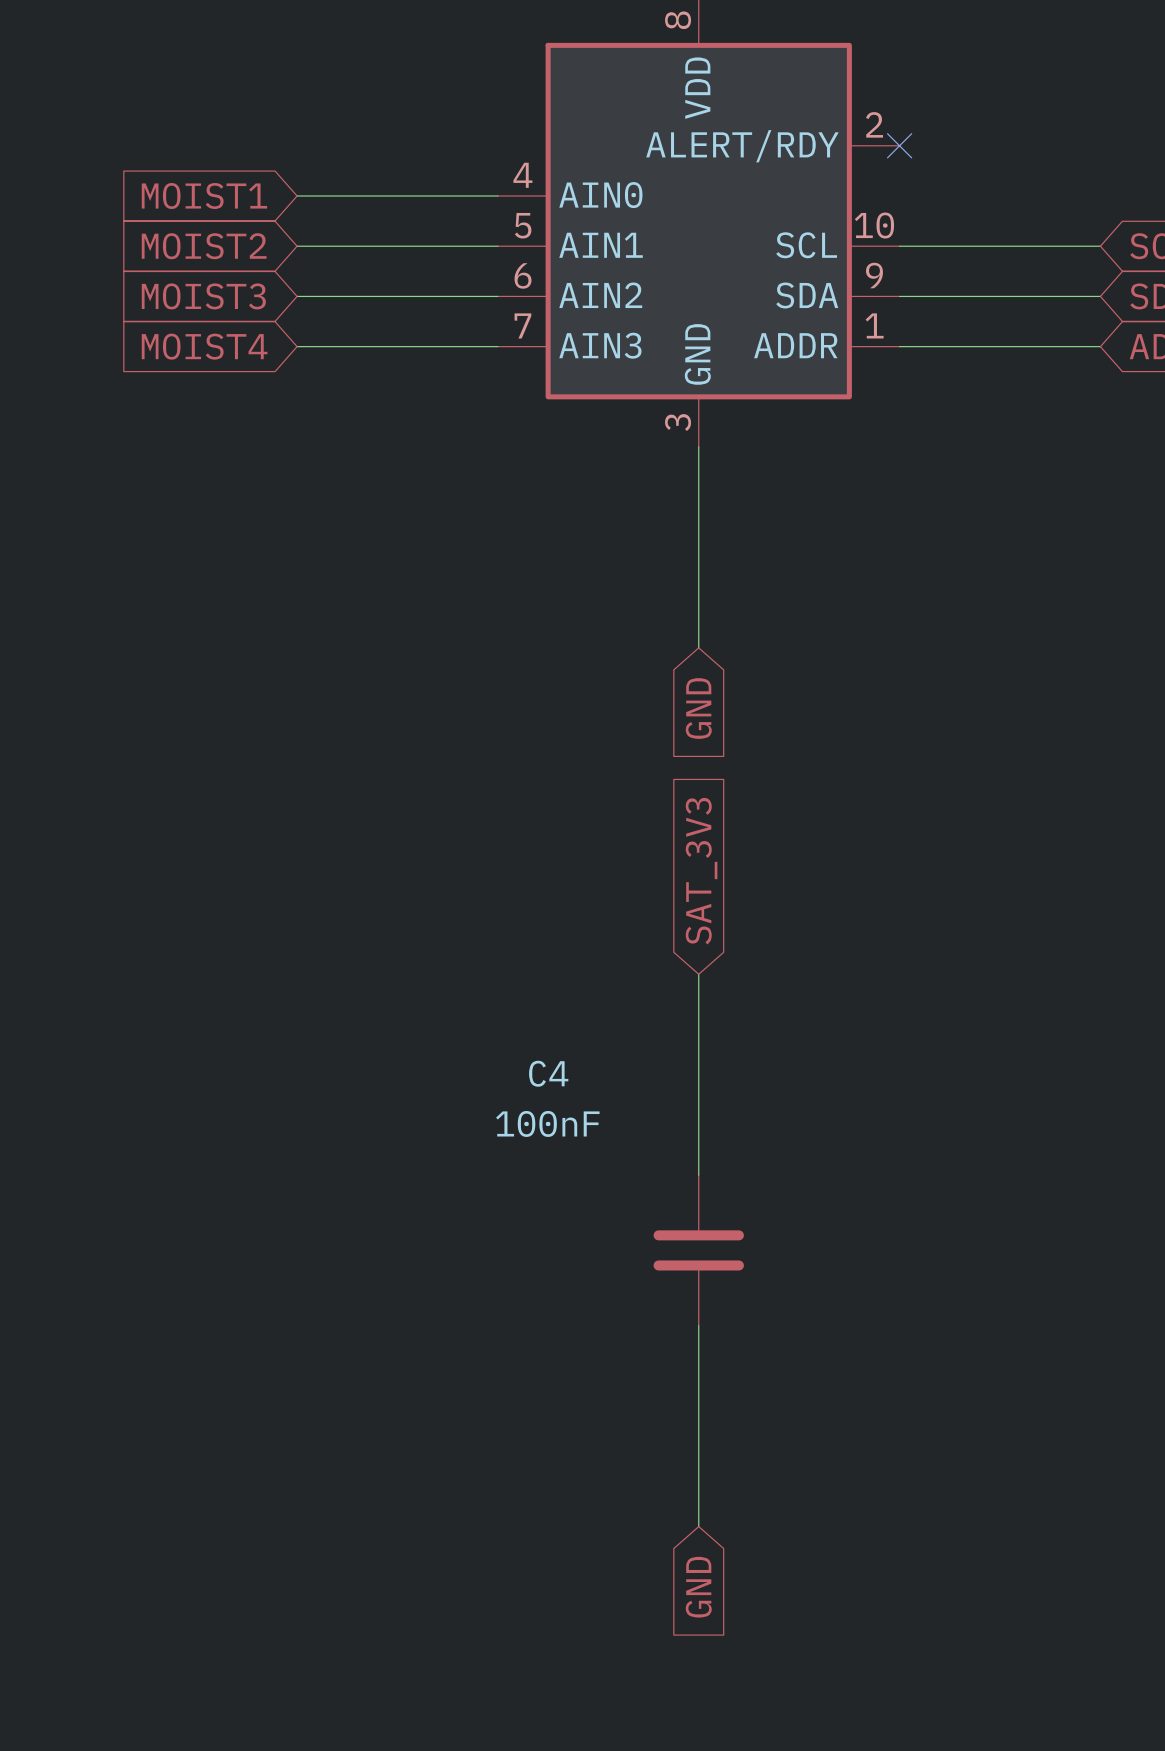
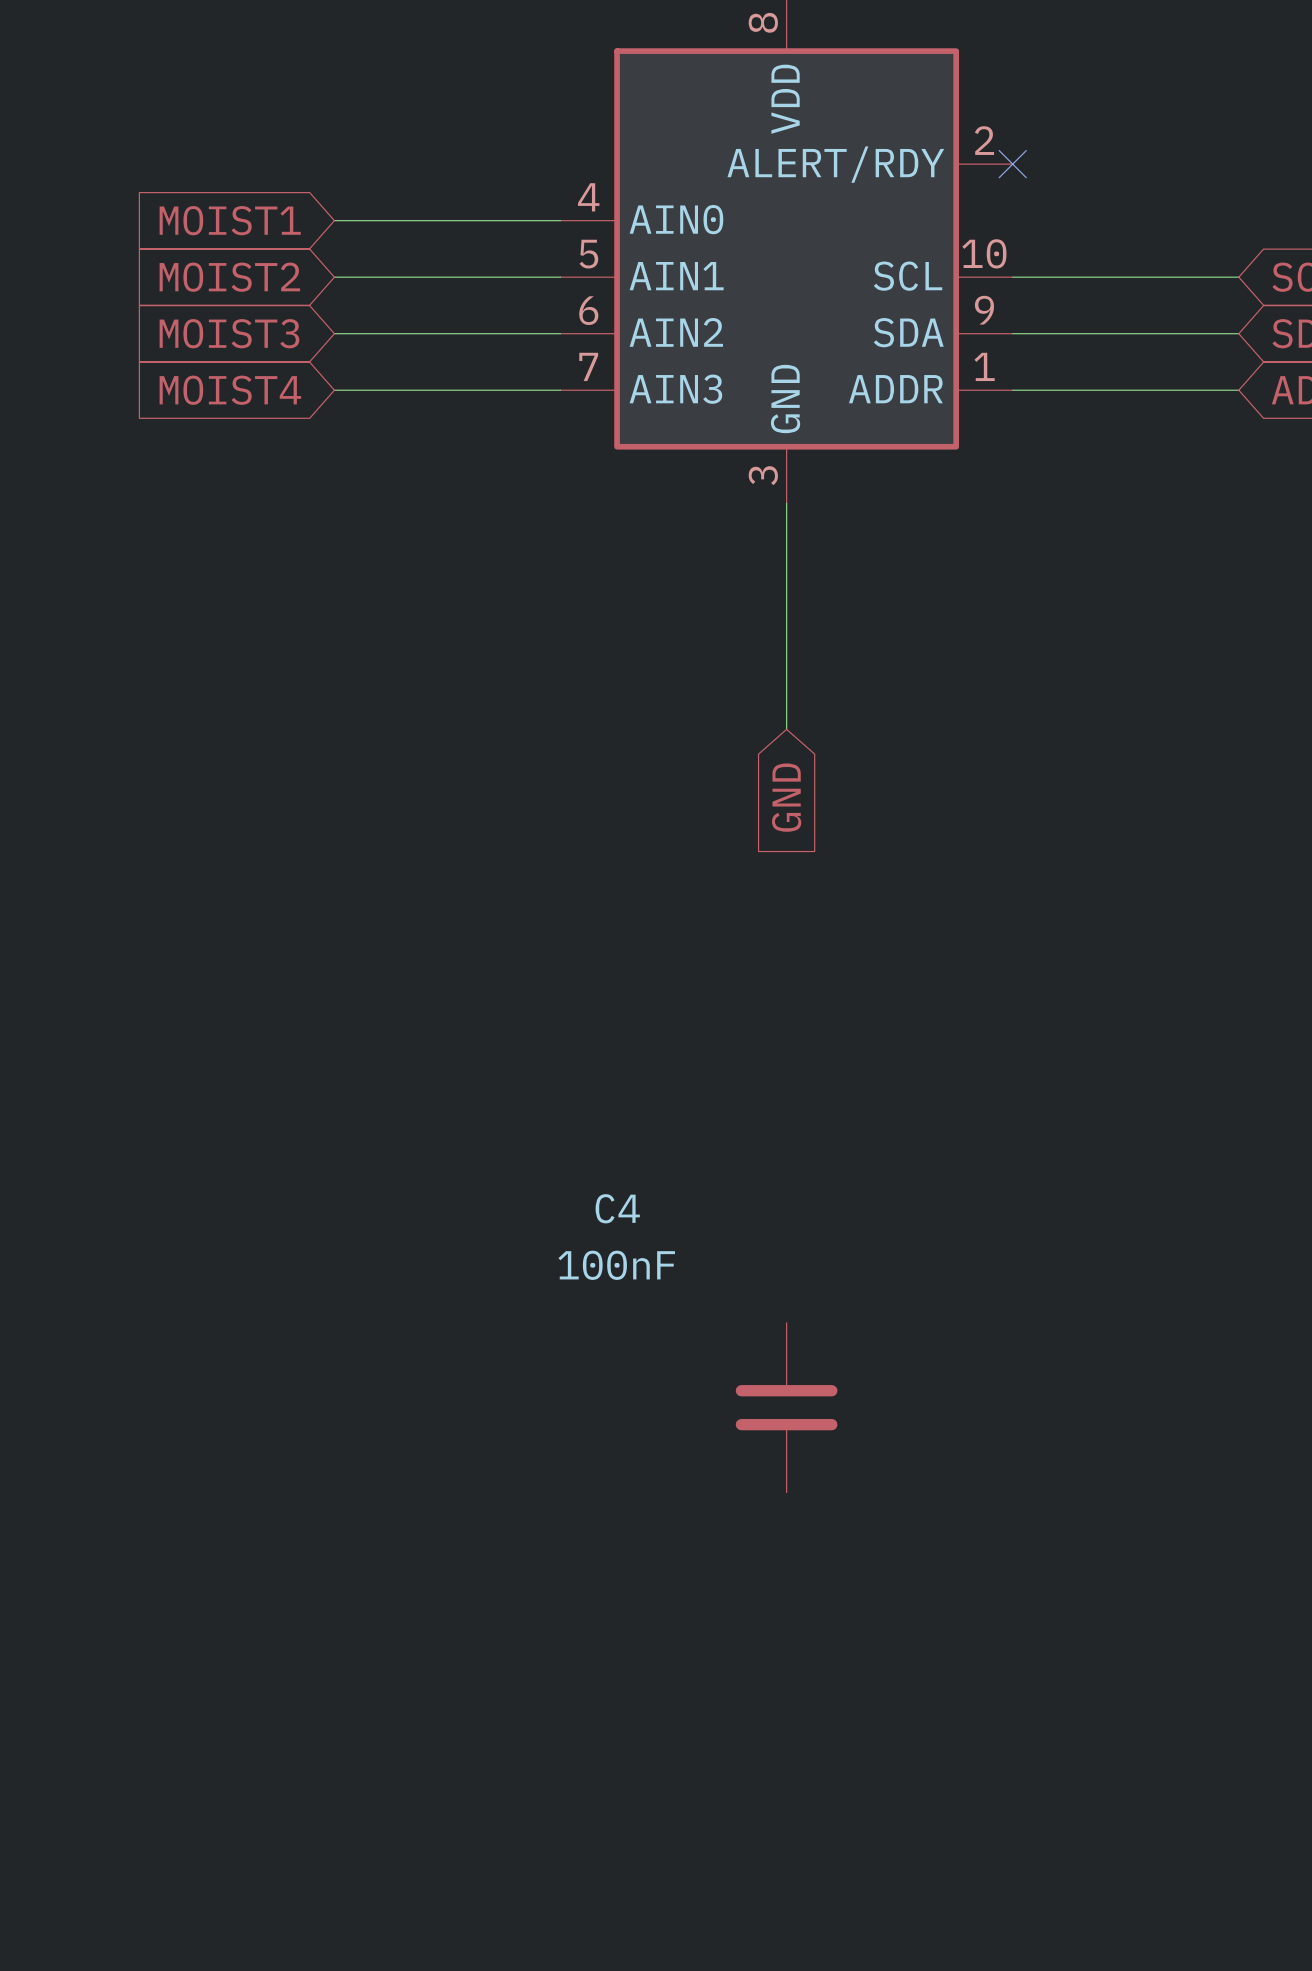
global label: SAT_3V3 (701, 871) -> none
wire: (698, 974) (698, 1175) -> none
wire: (698, 1325) (698, 1526) -> none
global label: GND (698, 1587) -> none

